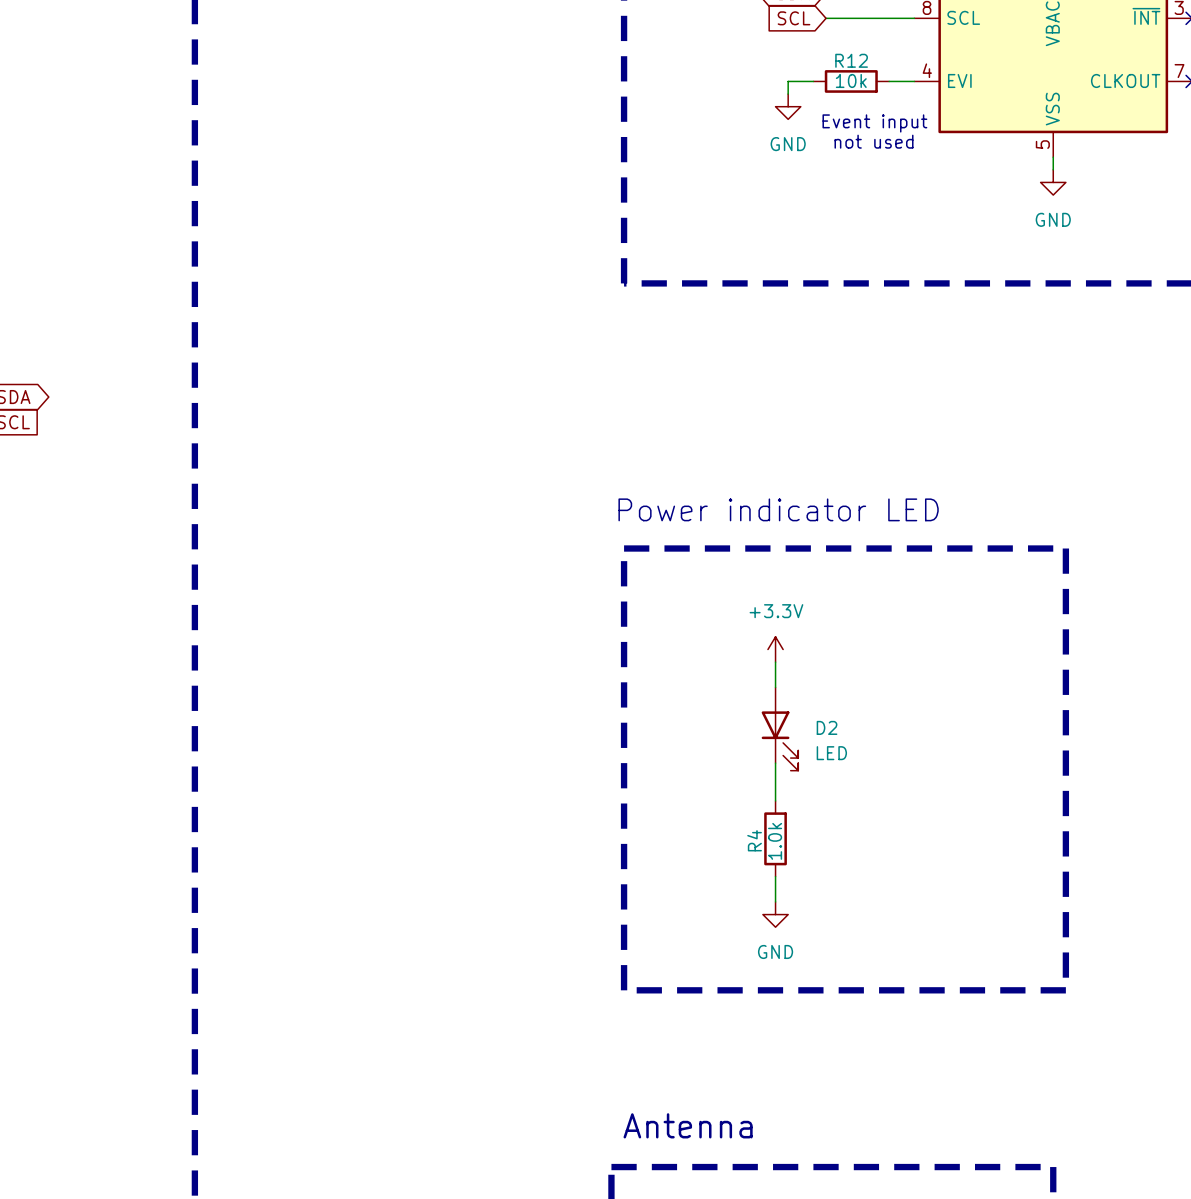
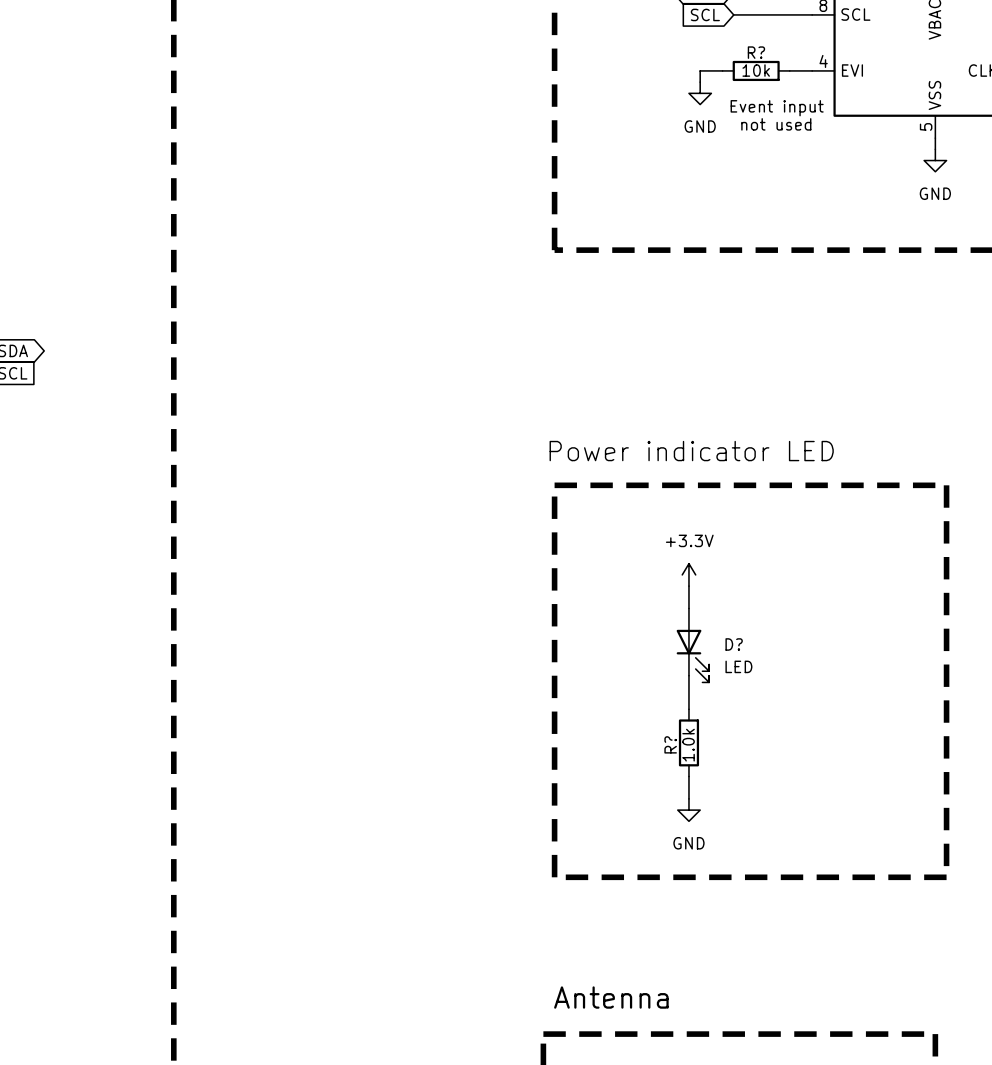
R12 name: R12 (851, 60) -> R? (756, 52)
D2 name: D2 (827, 727) -> D? (734, 644)
R4 name: R4 (754, 840) -> R? (670, 744)

